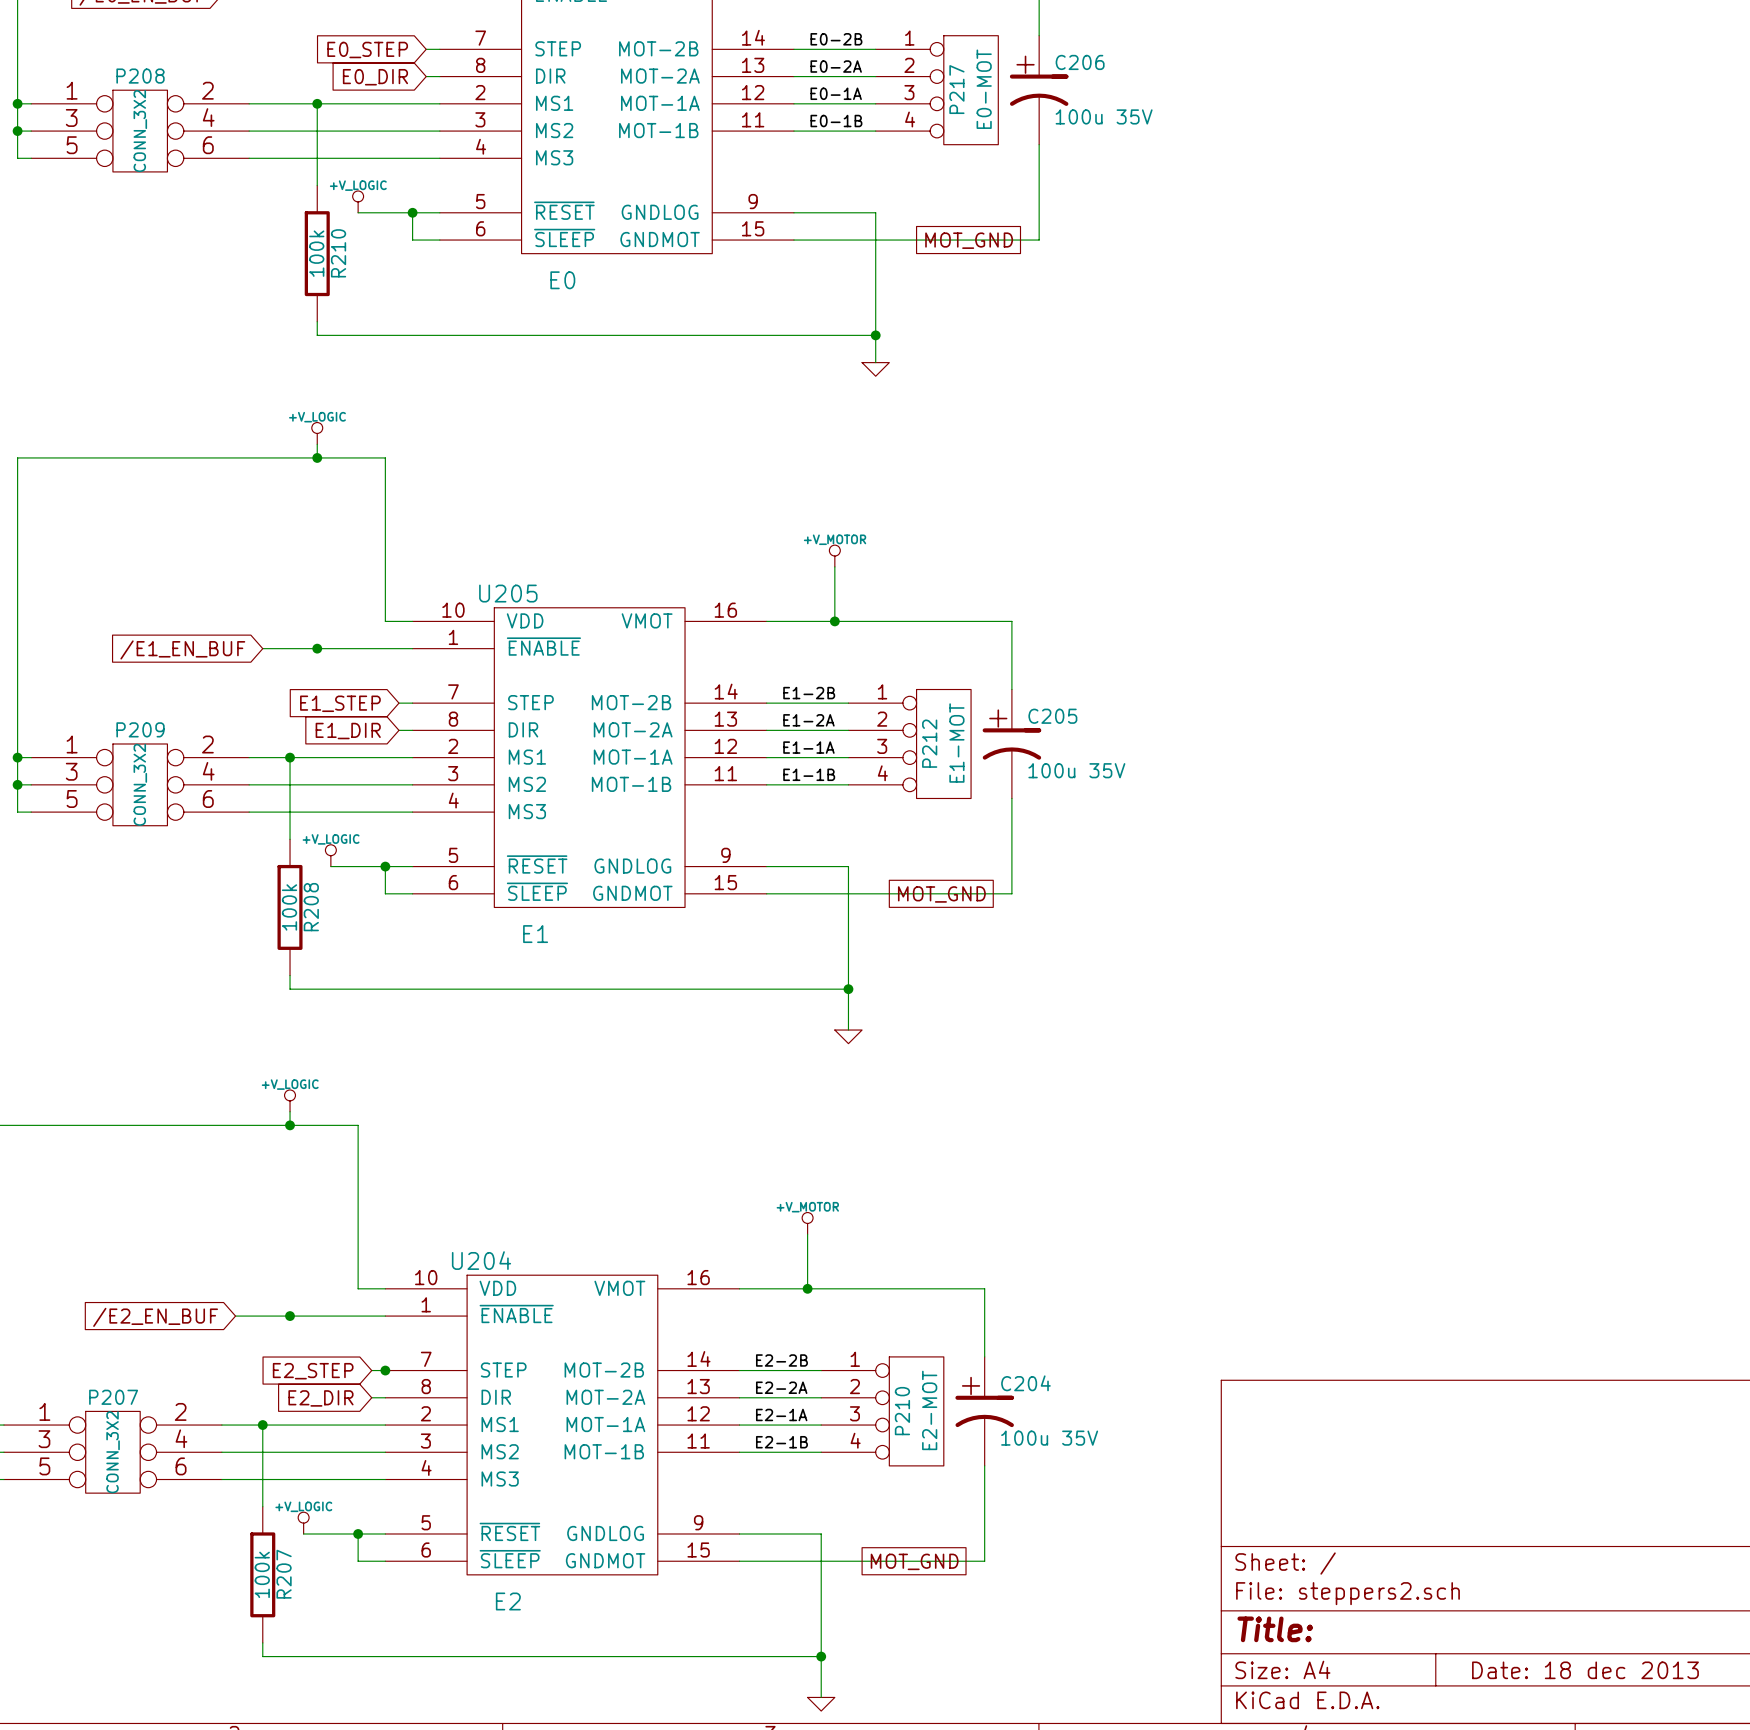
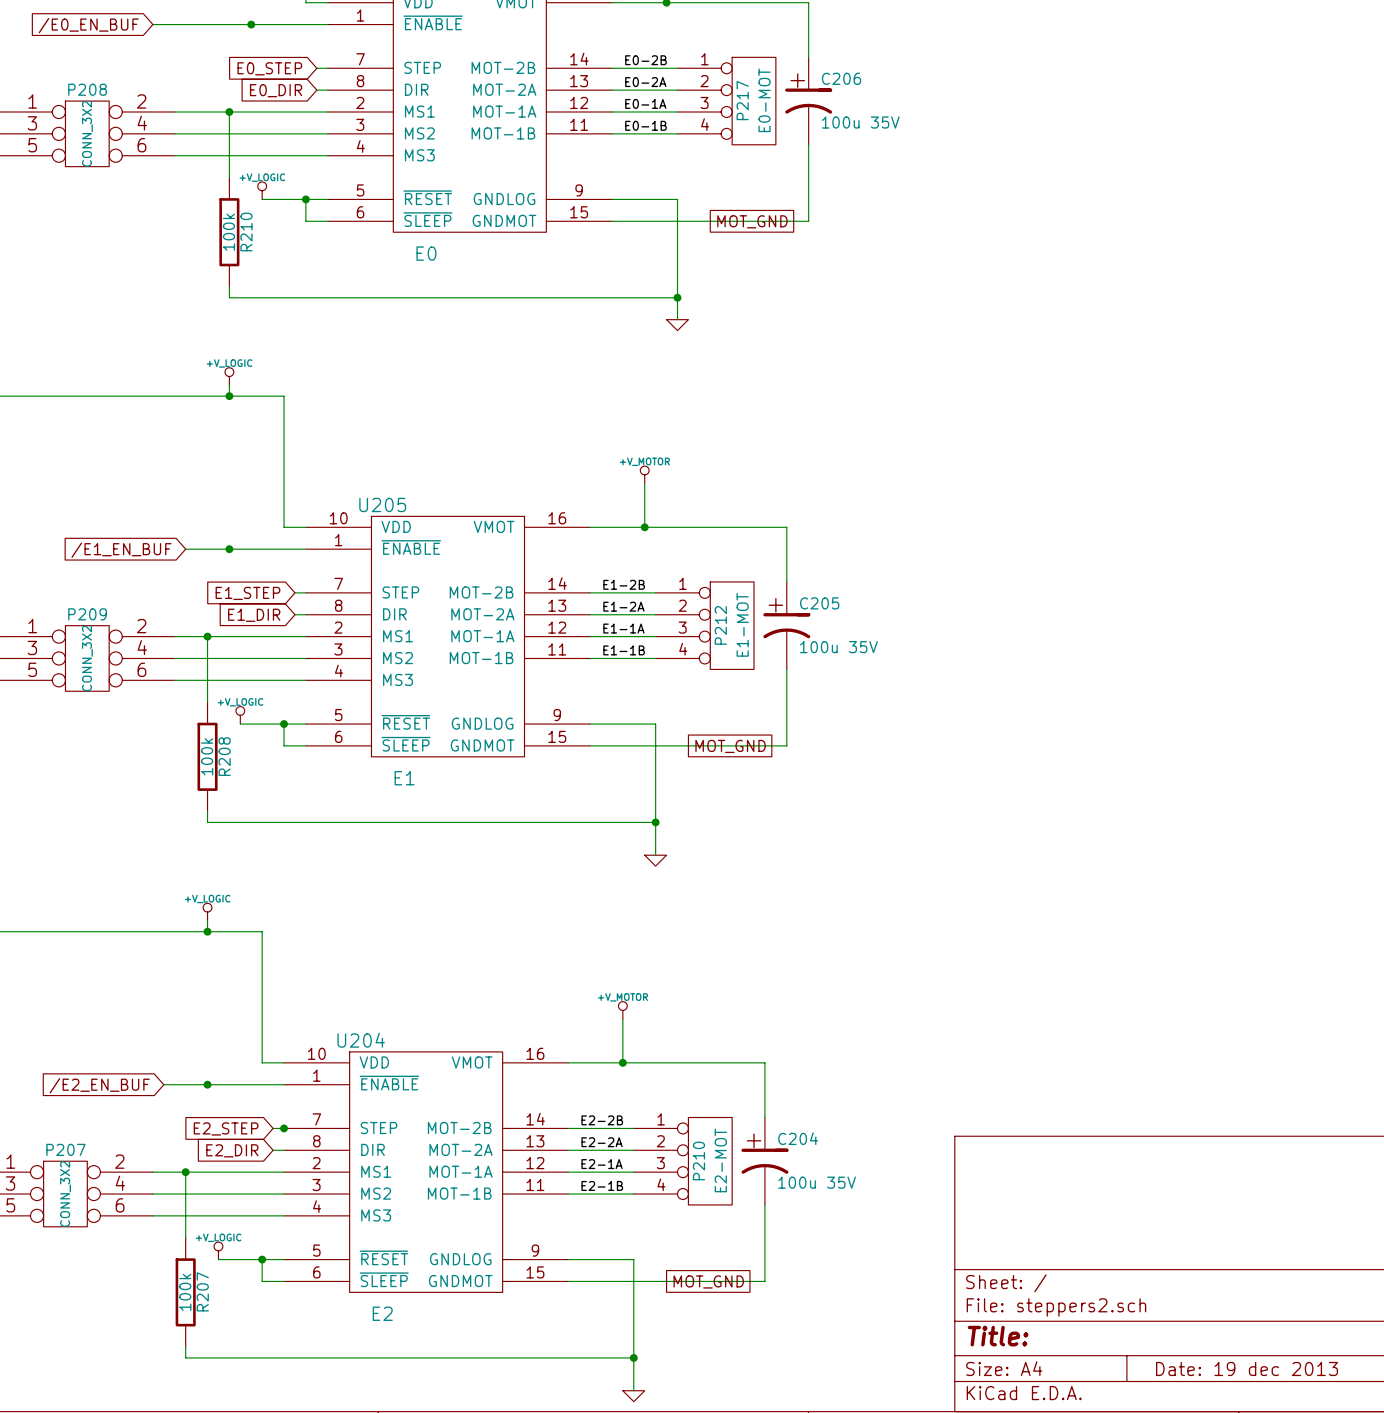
title block: Date: 18 dec 2013 (1585, 1670) -> Date: 19 dec 2013 (1247, 1368)

